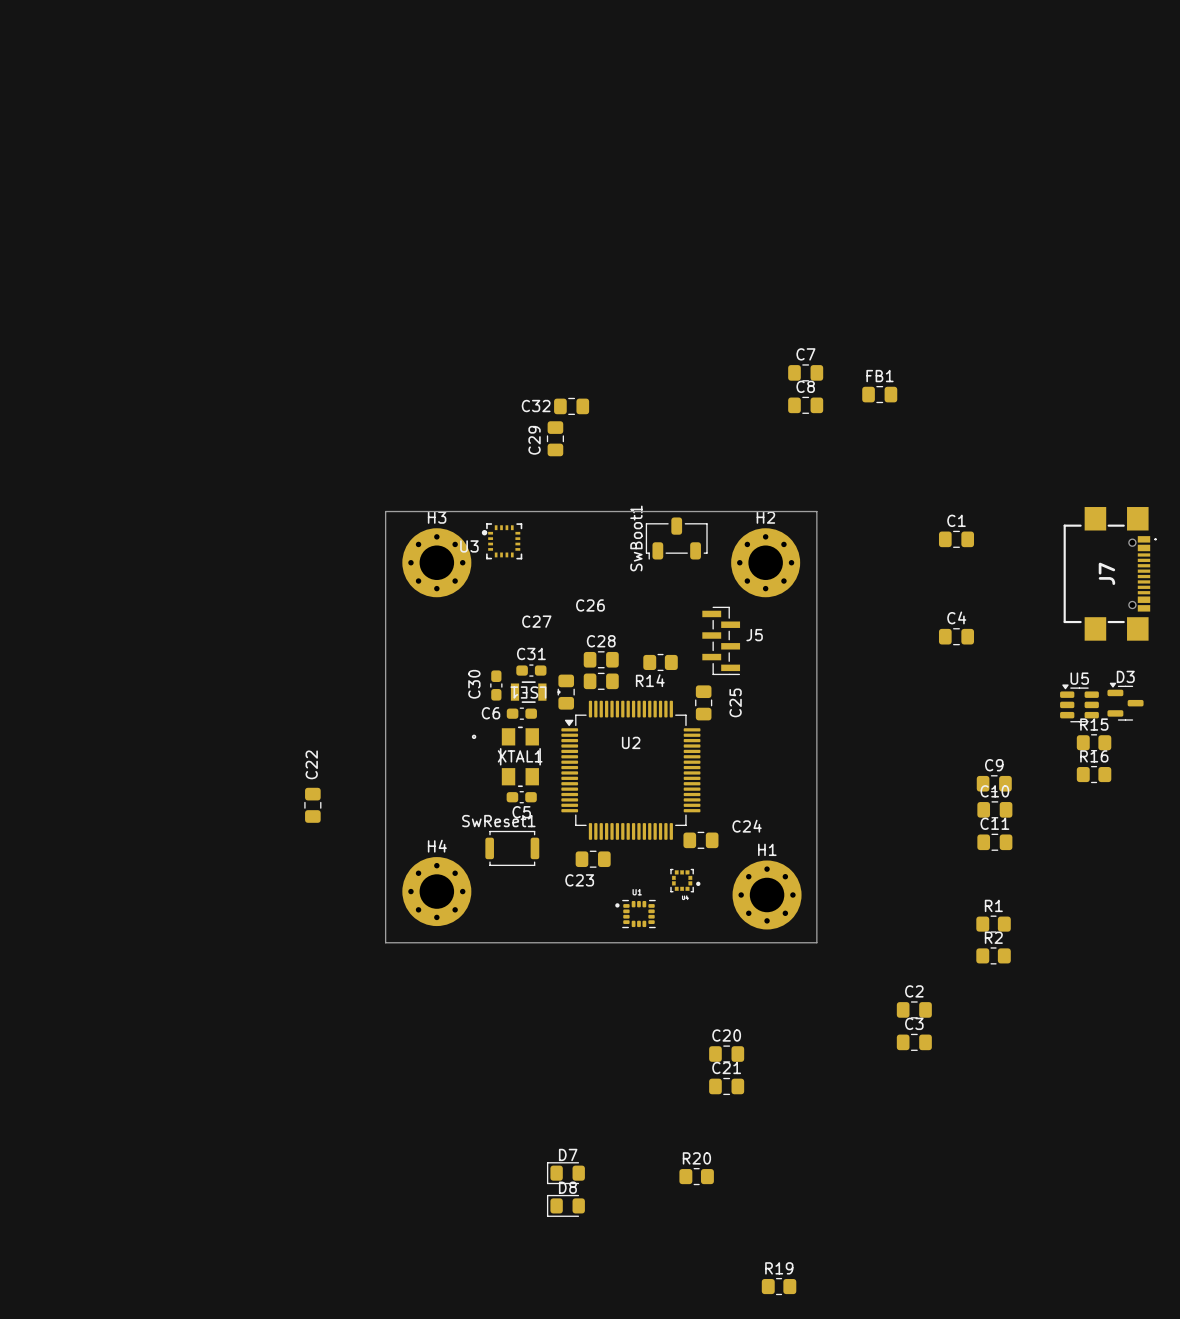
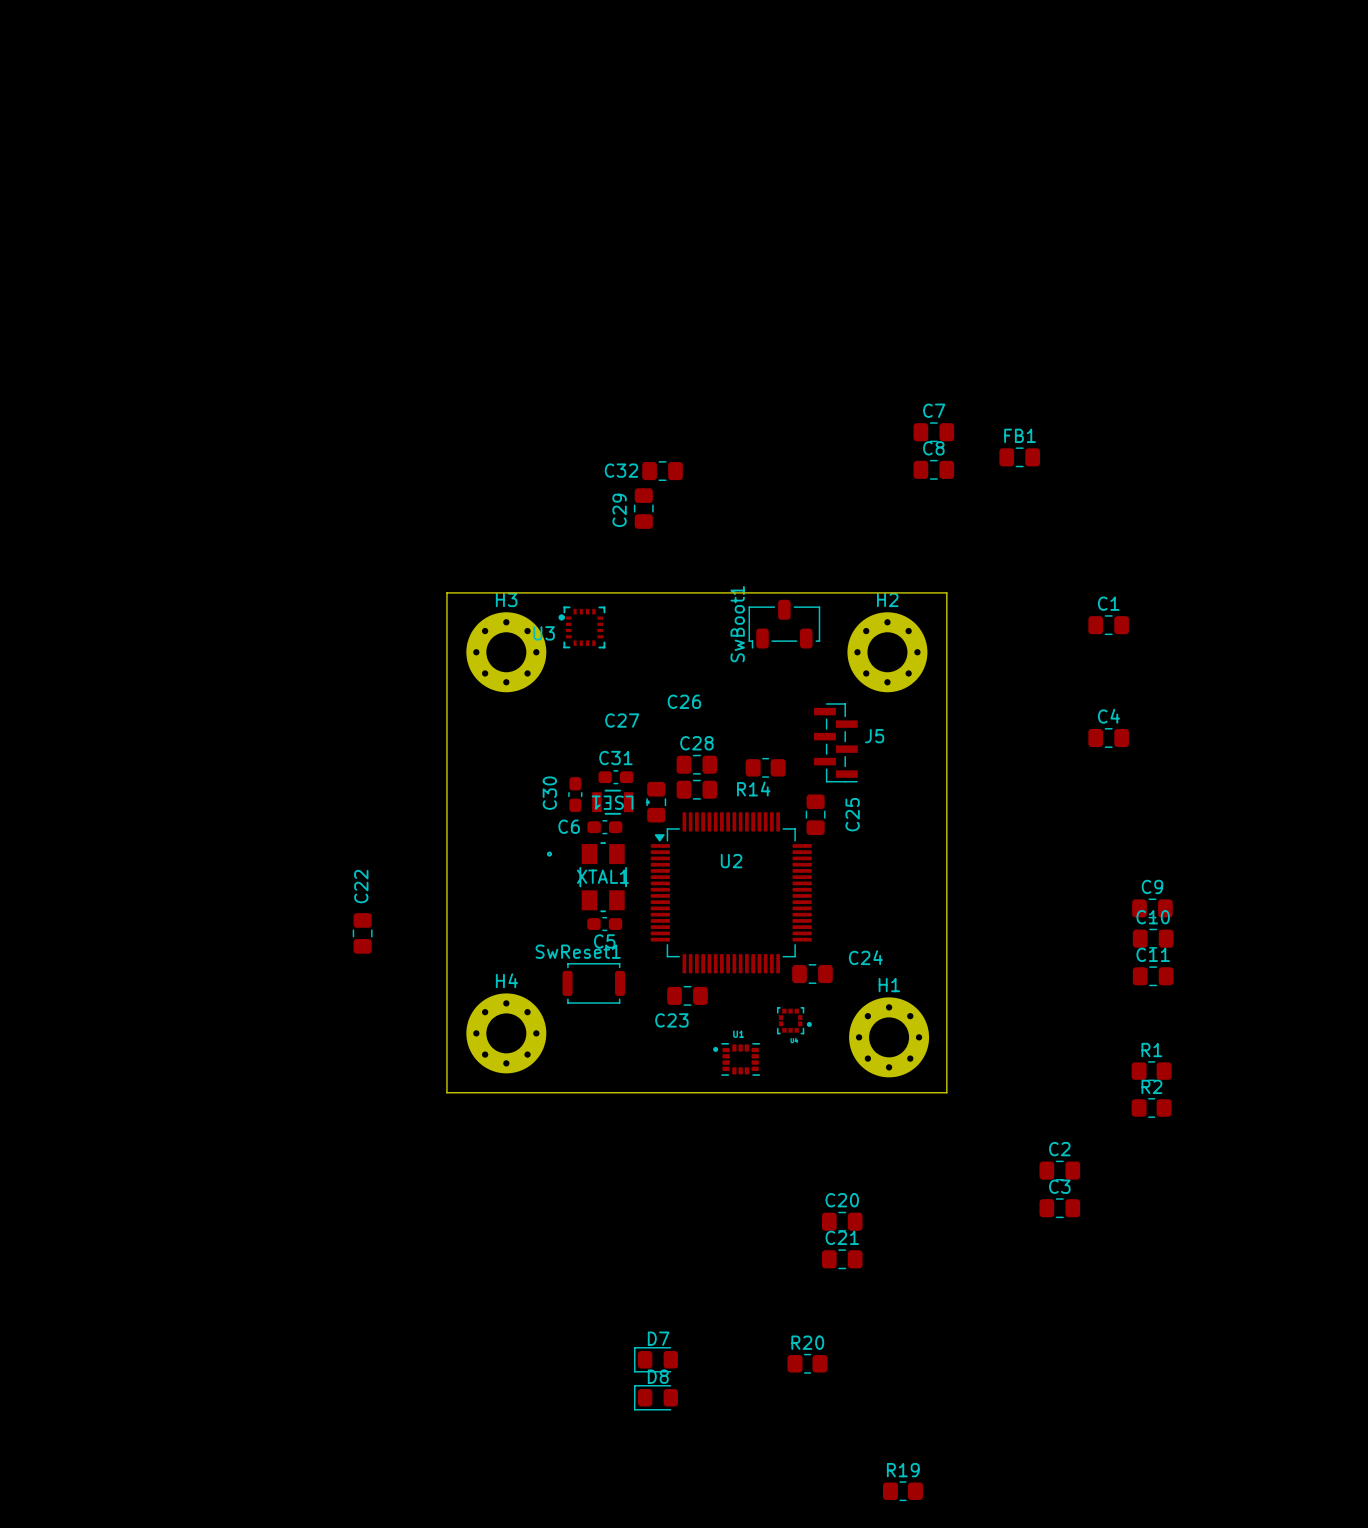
J7: (1110, 573) -> none
D3: (1125, 701) -> none
U5: (1079, 703) -> none
R15: (1094, 742) -> none
R16: (1094, 774) -> none

